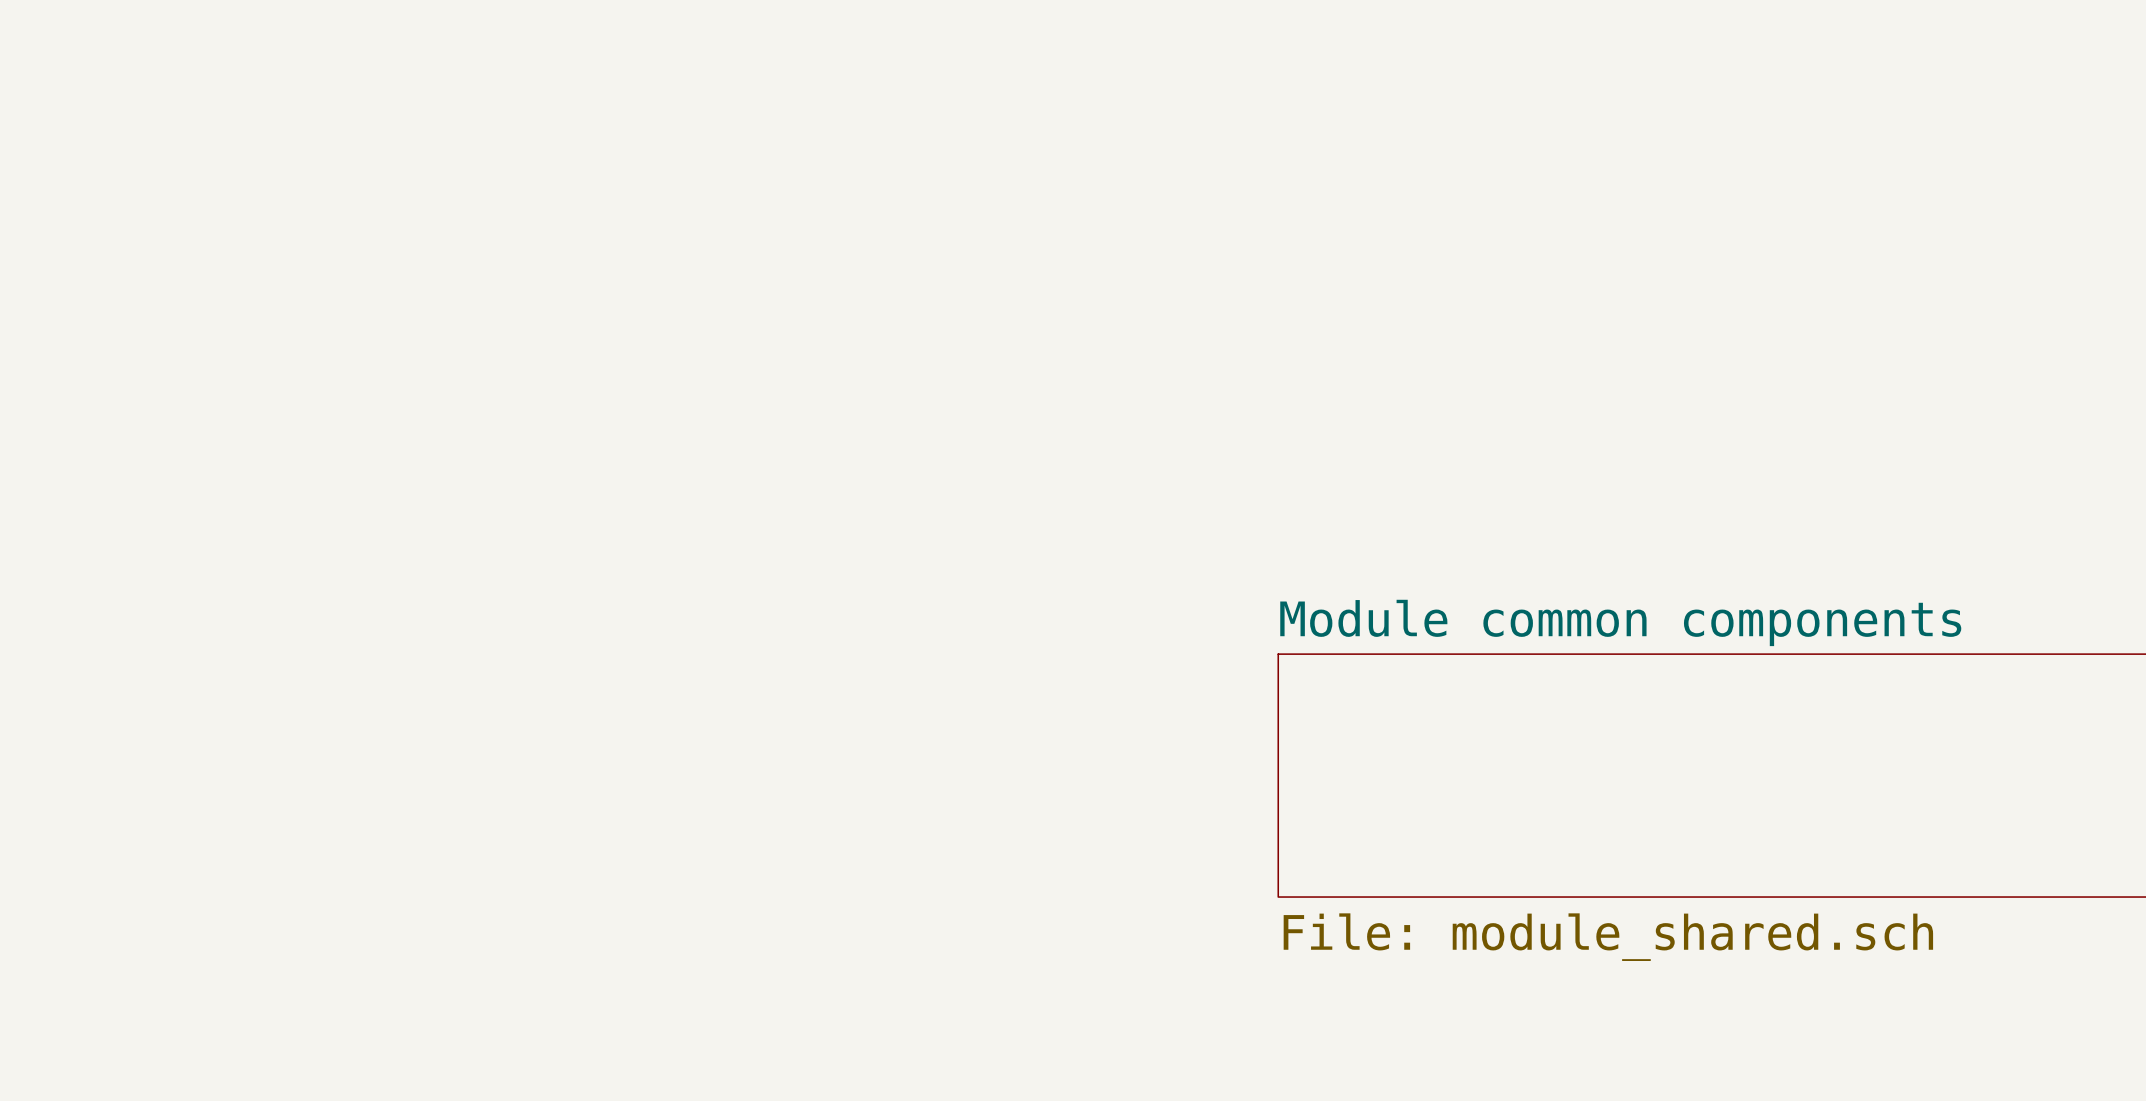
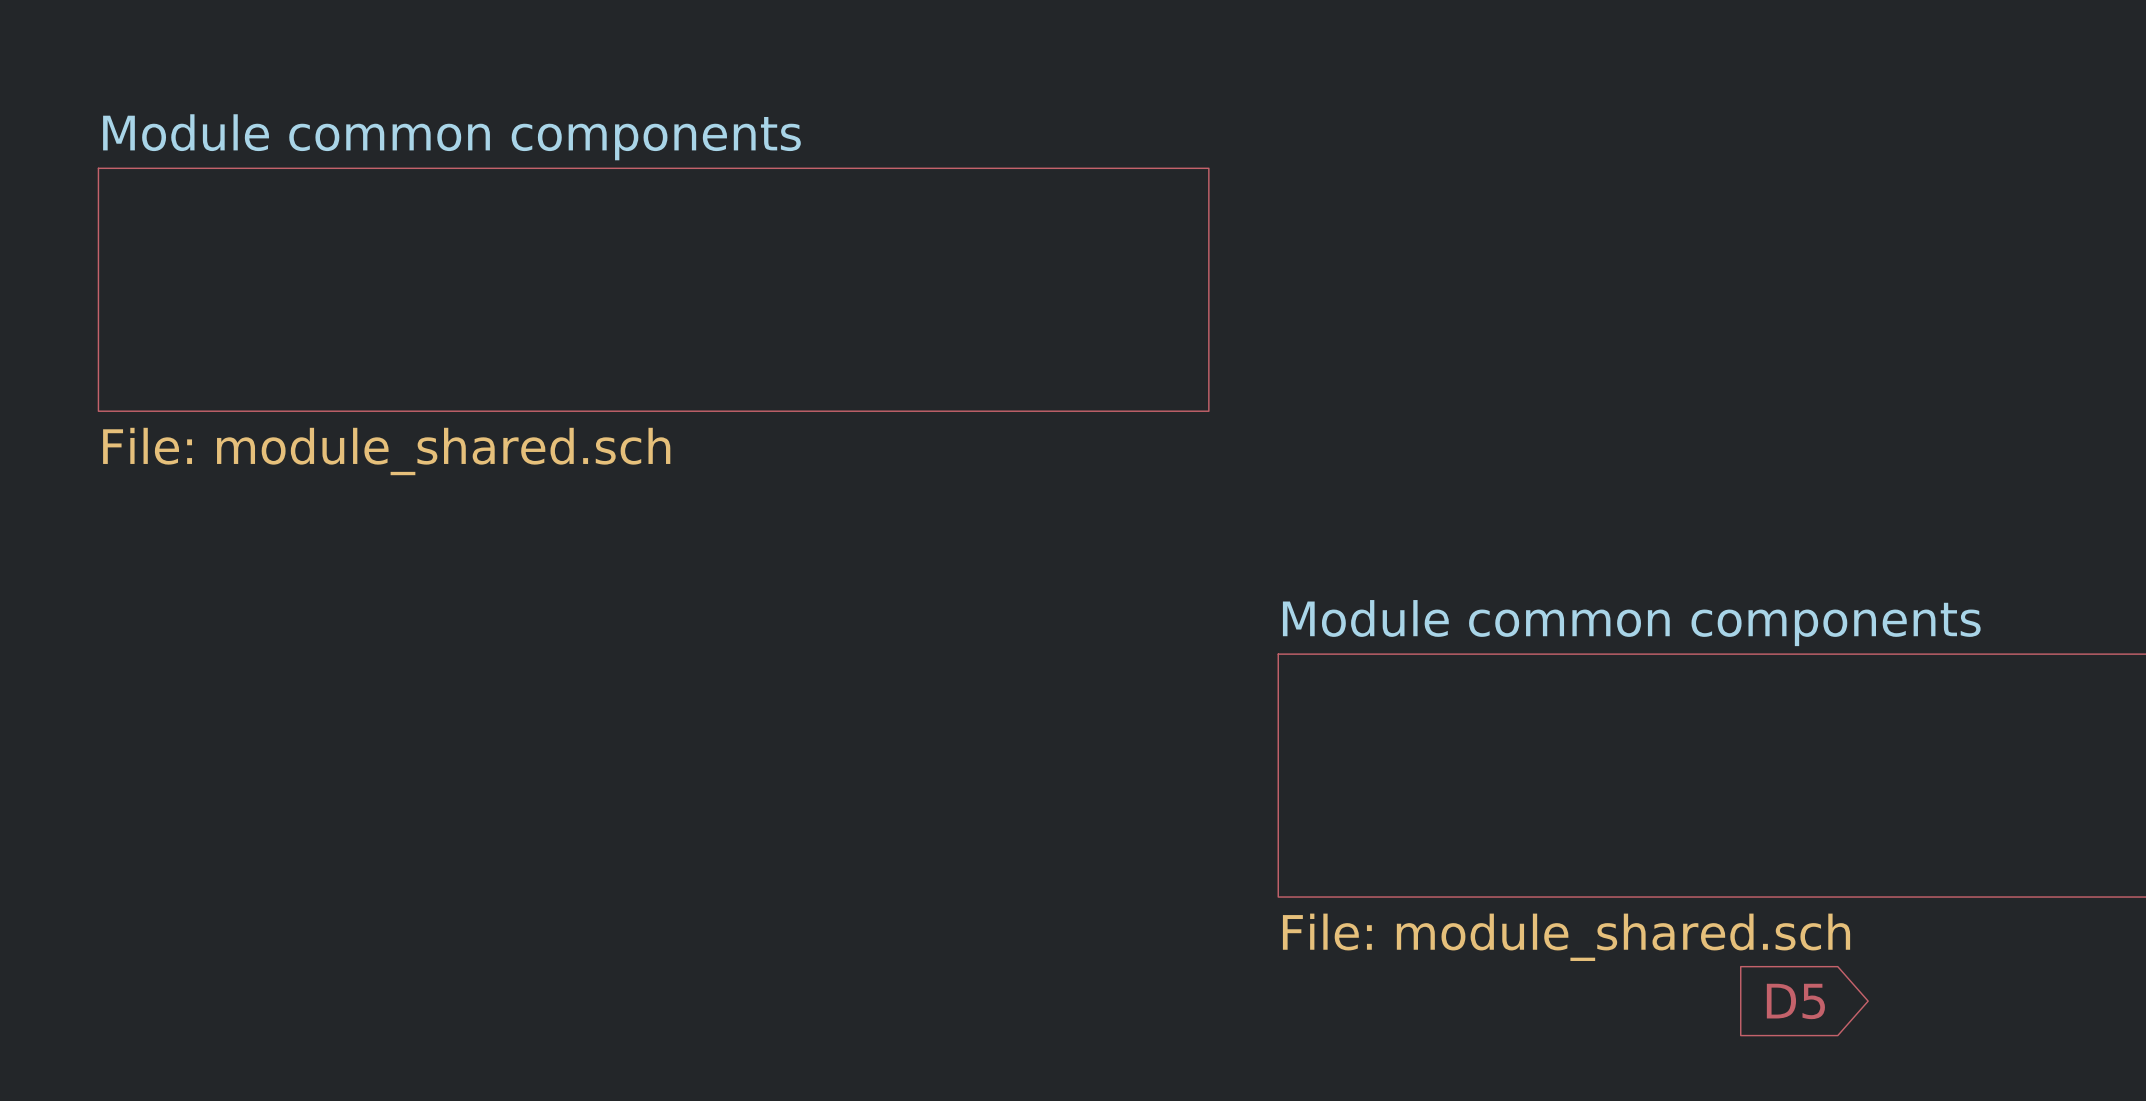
sheet Module common components: none -> File: module_shared.sch (653, 289)
global label: none -> D5 (1795, 1001)

